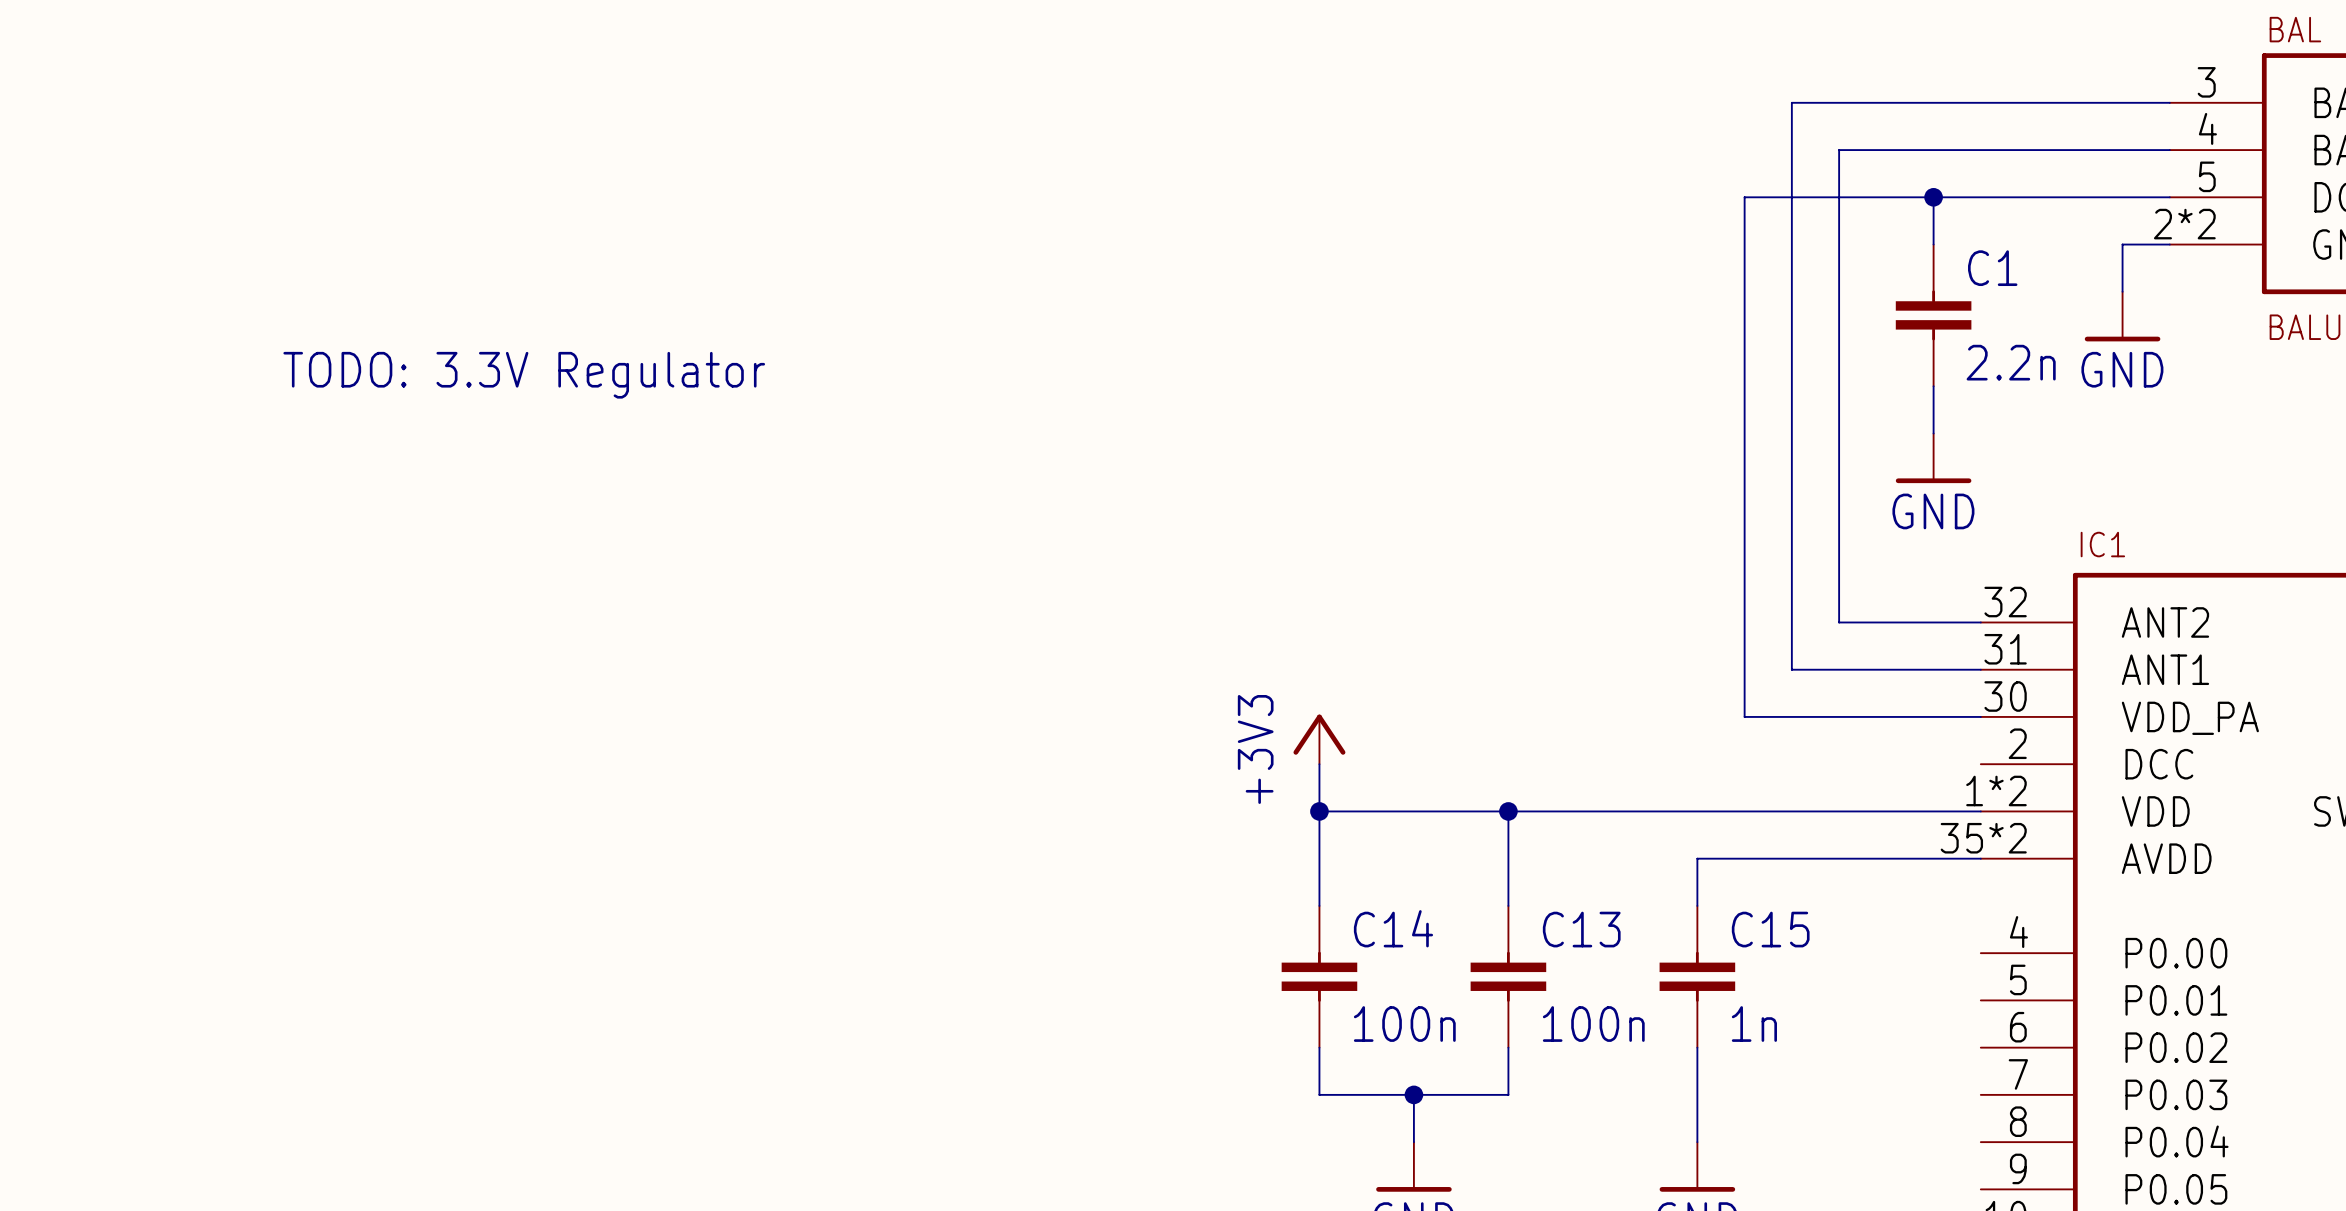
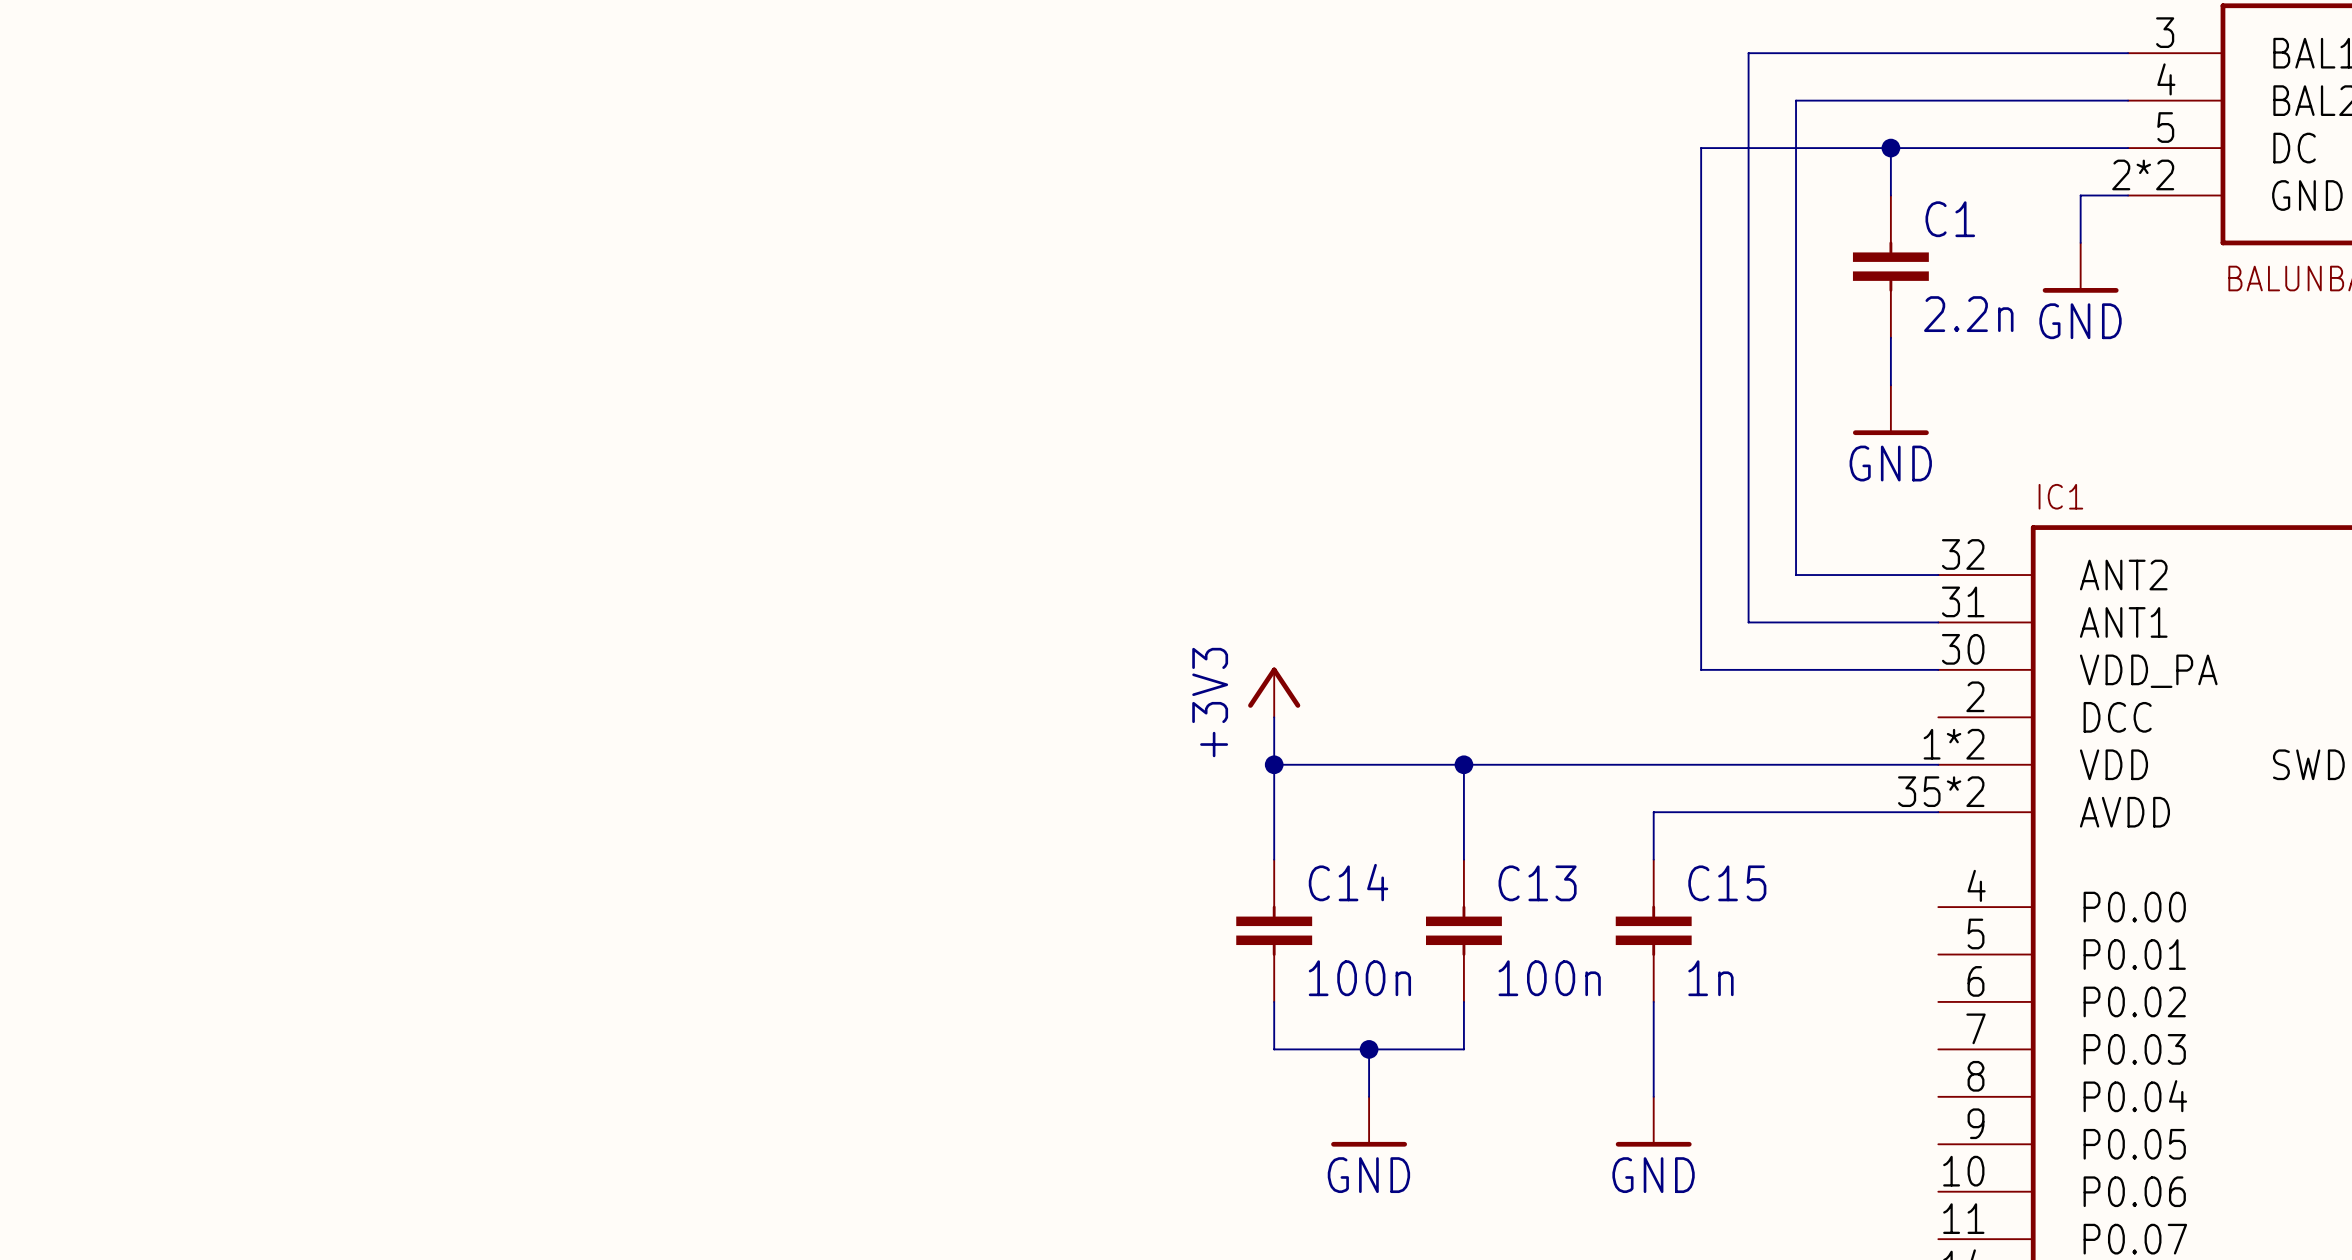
text: TODO: 3.3V Regulator (524, 375) -> none

